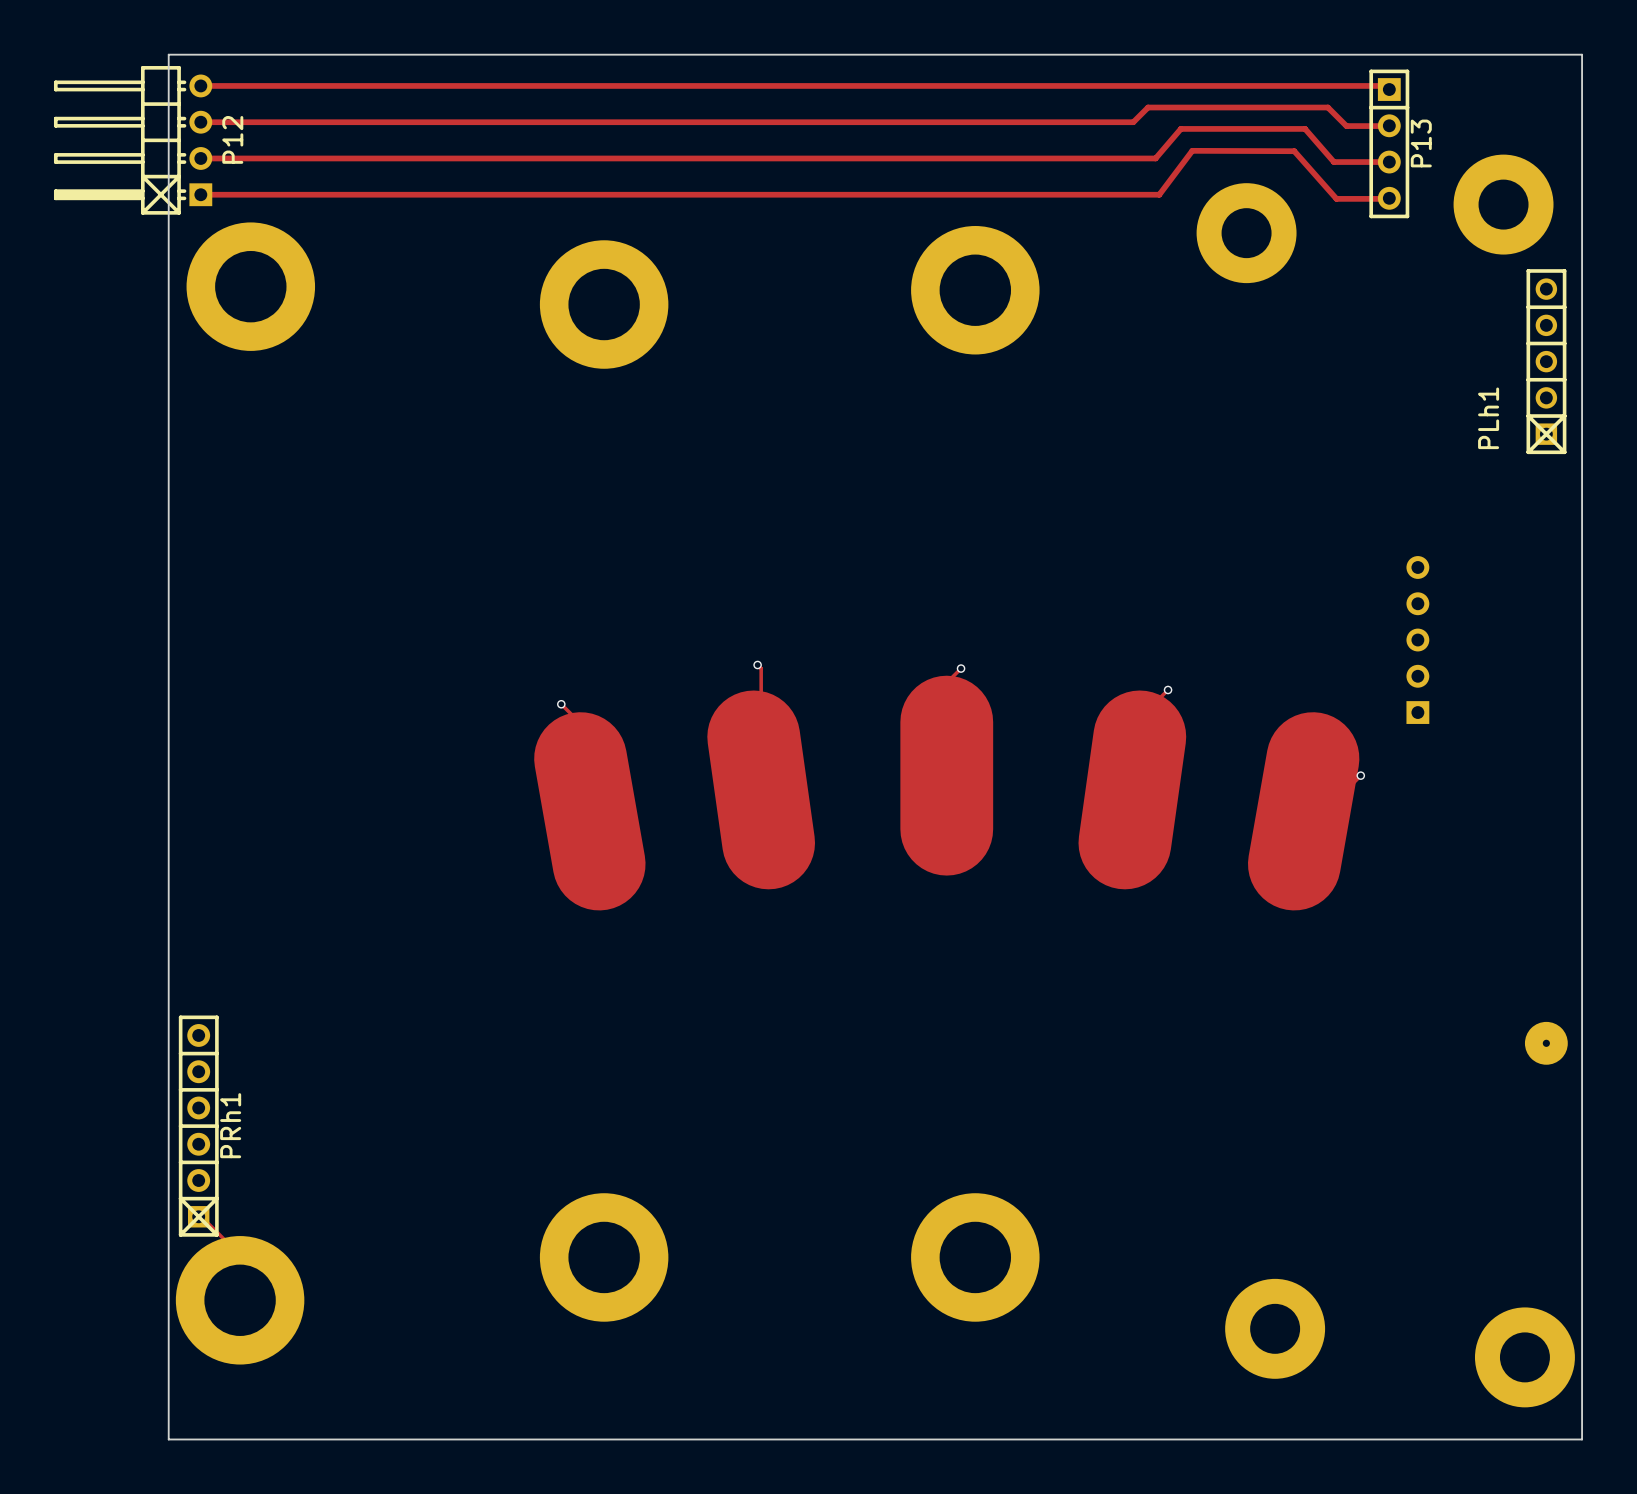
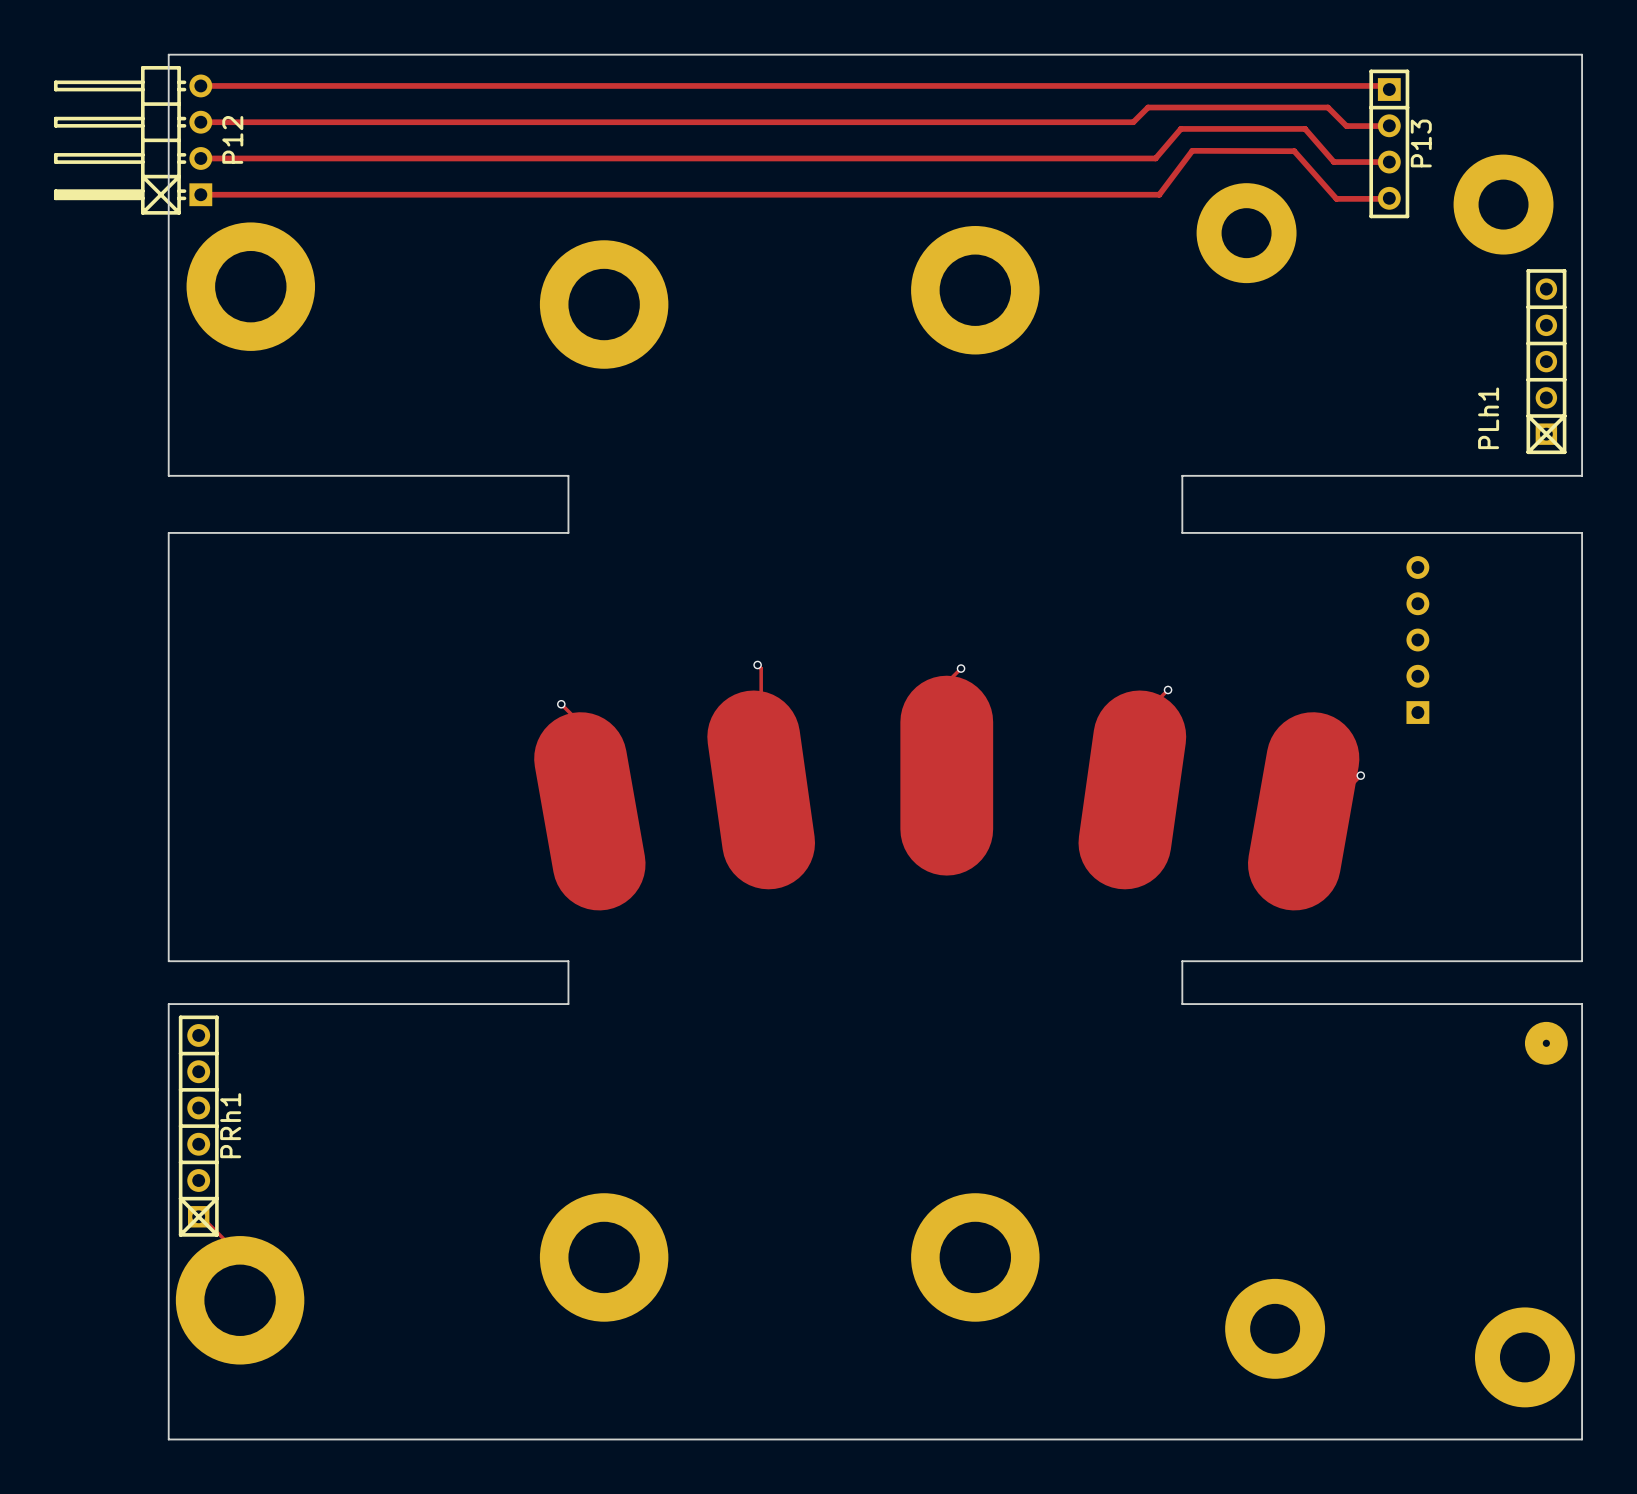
board edge: (168, 475) (168, 532) -> (168, 475) (568, 475) (568, 532) (168, 532)
board edge: (1582, 475) (1582, 532) -> (1582, 475) (1182, 475) (1182, 532) (1582, 532)
board edge: (168, 961) (168, 1004) -> (168, 961) (568, 961) (568, 1004) (168, 1004)
board edge: (1582, 961) (1582, 1004) -> (1582, 961) (1182, 961) (1182, 1004) (1582, 1004)

